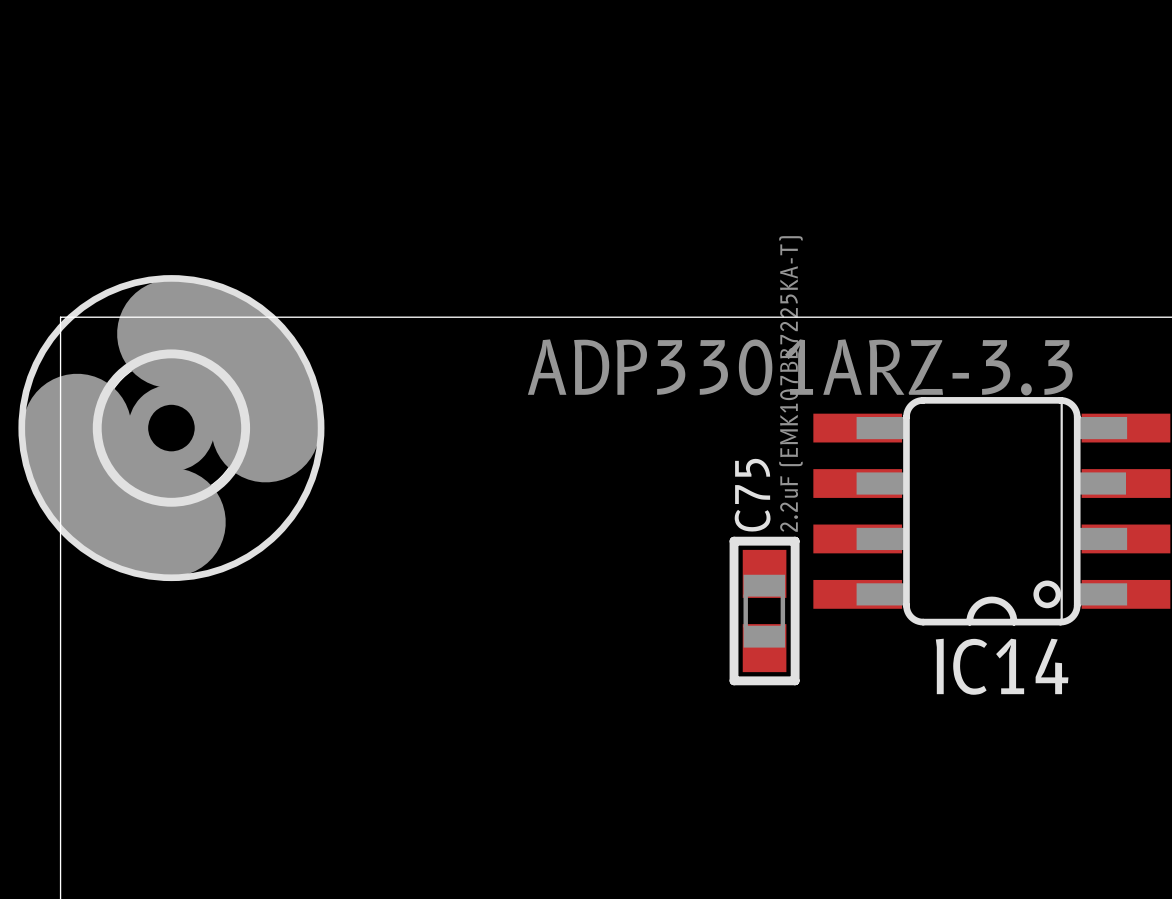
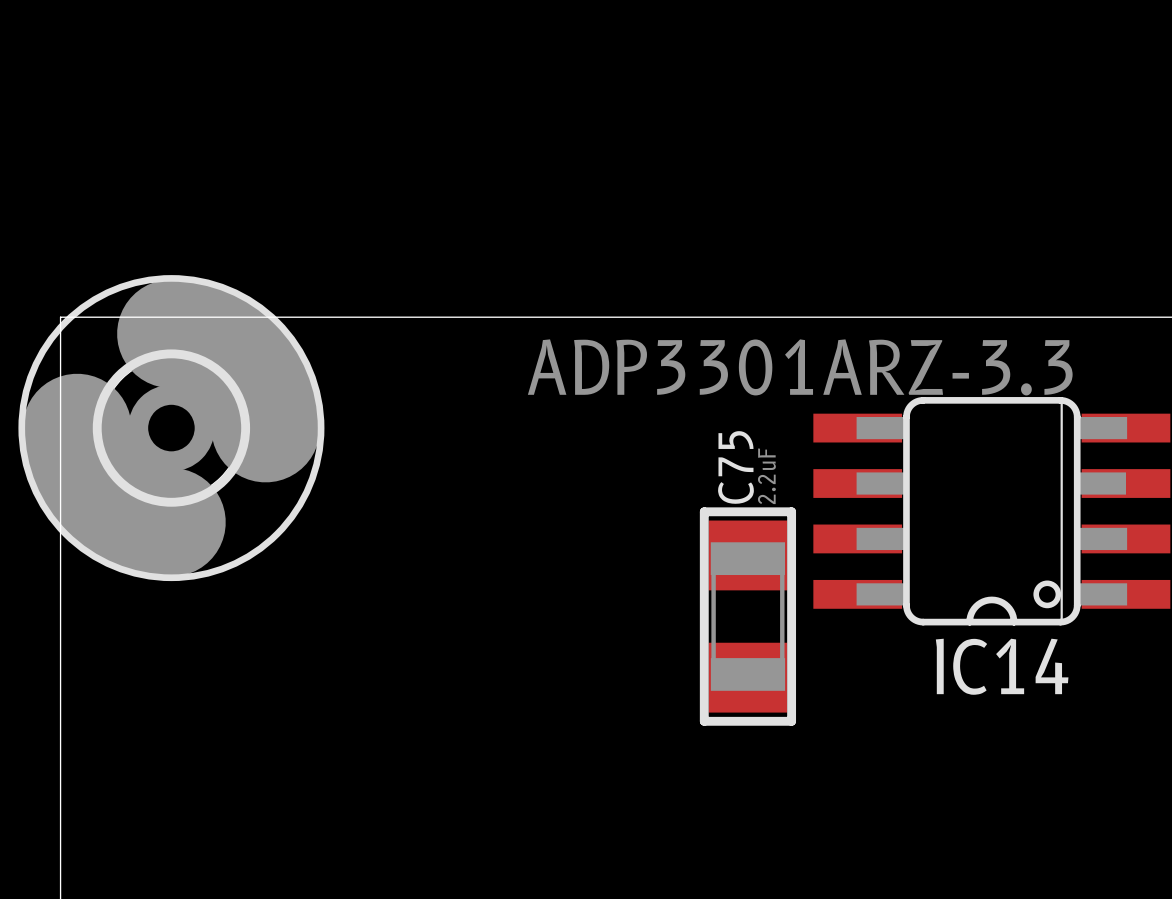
C75 value: 2.2uF (EMK107BB7225KA-T) (790, 383) -> 2.2uF (766, 476)
C75 footprint: [729, 536, 800, 686] -> [699, 507, 797, 726]

